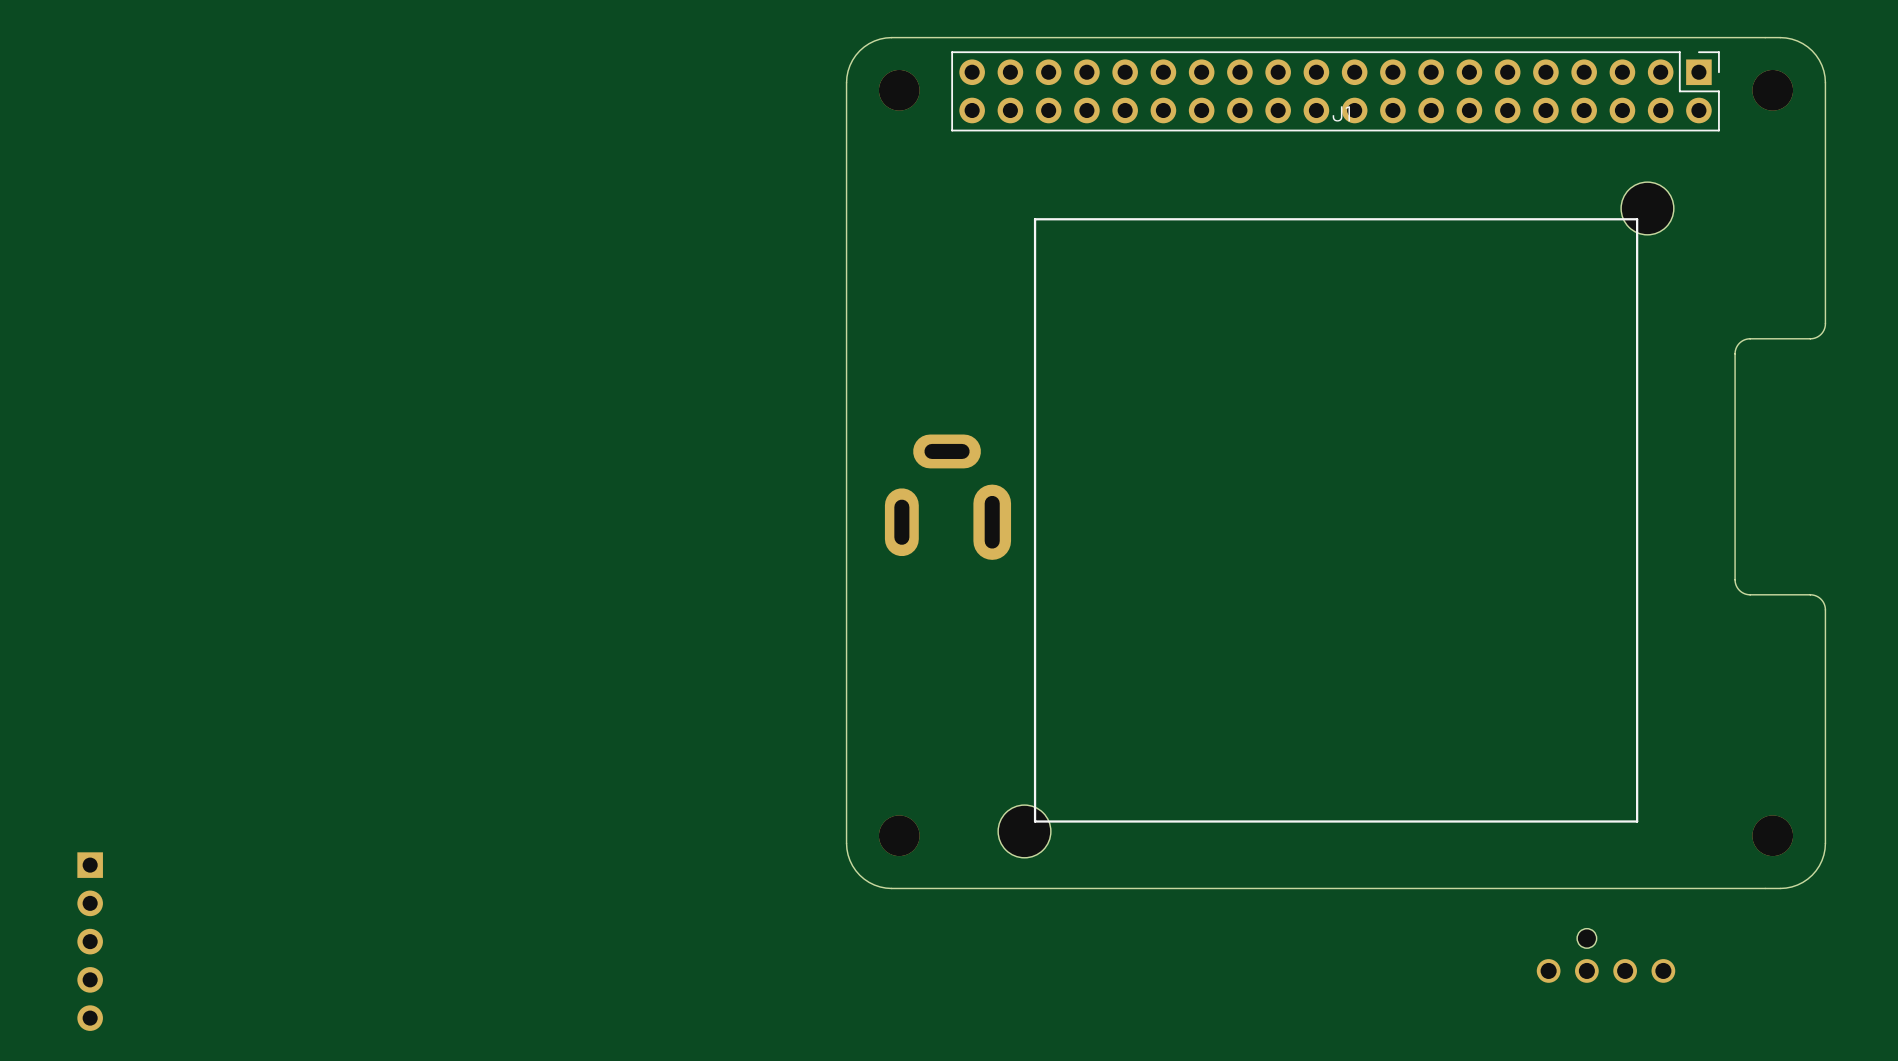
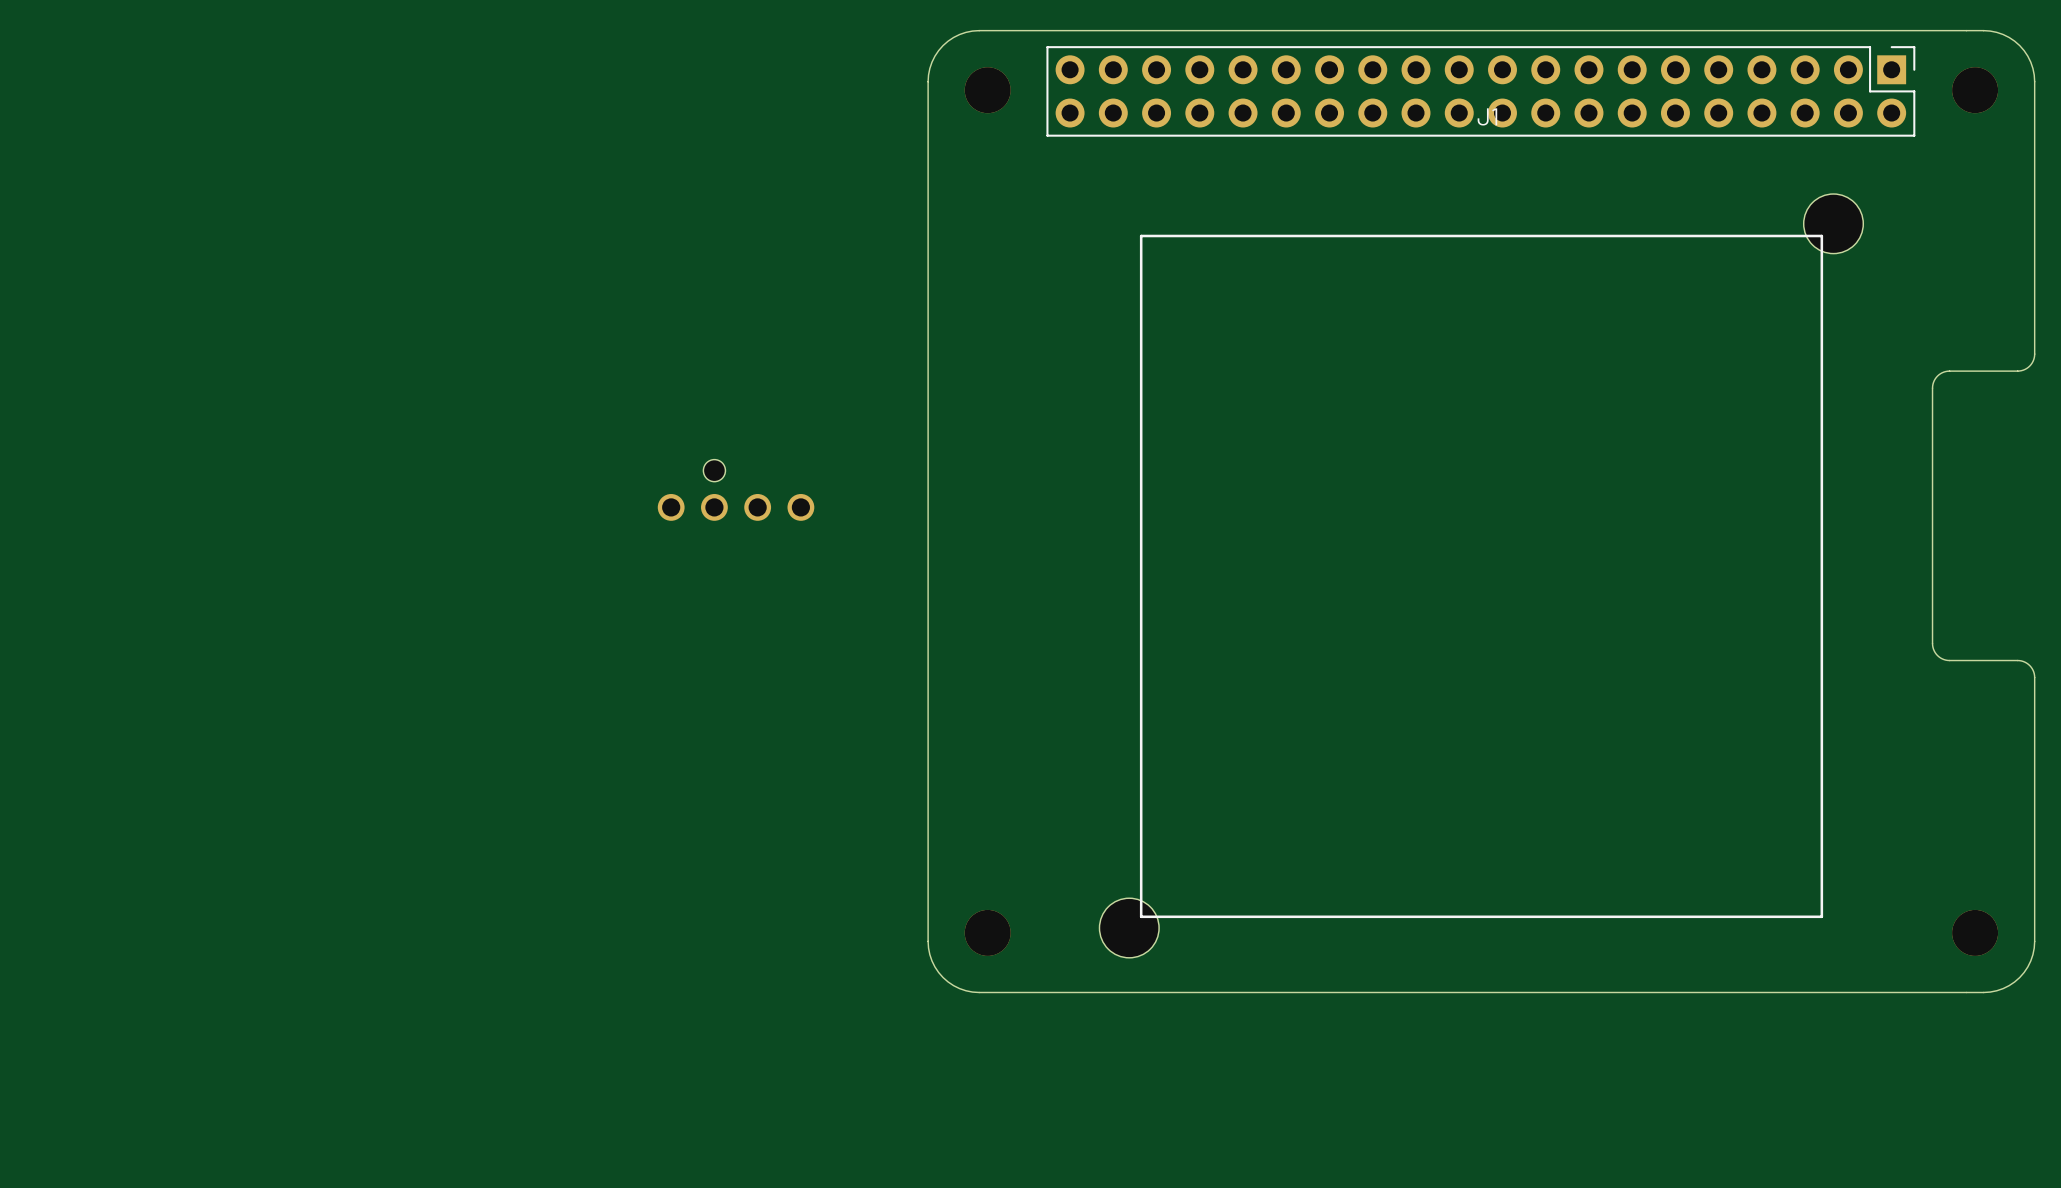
part: none -> (736, 490)
part: (947, 497) -> none
part: (90, 941) -> none
part: (1606, 955) -> none

